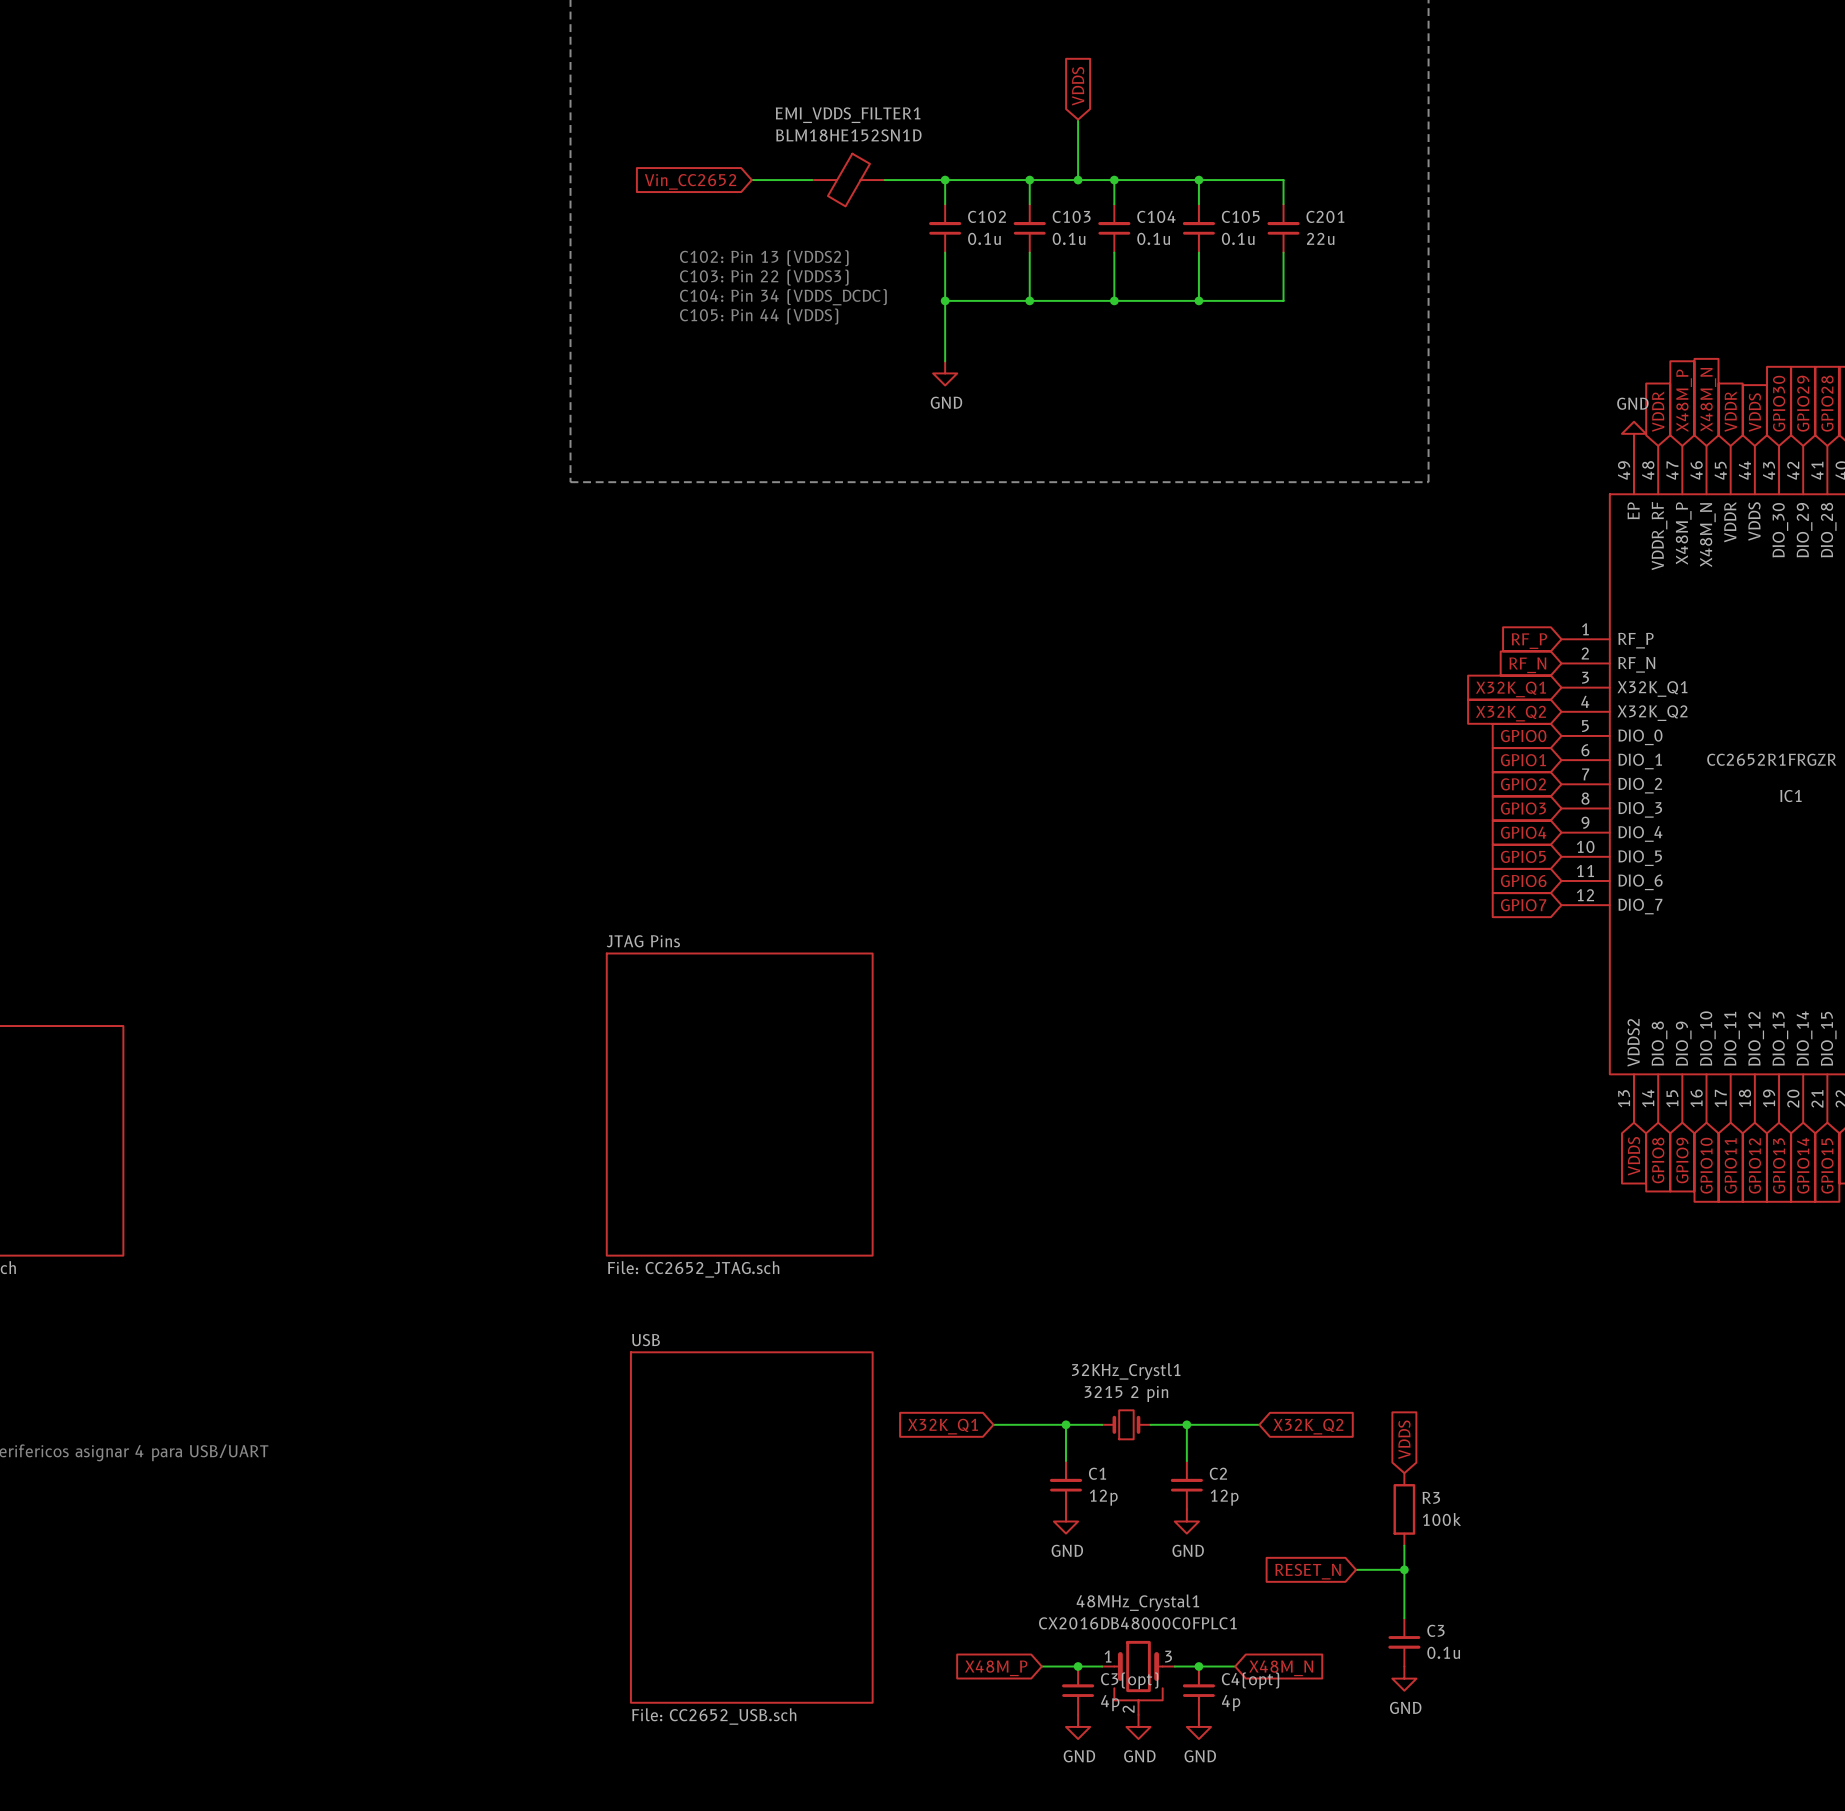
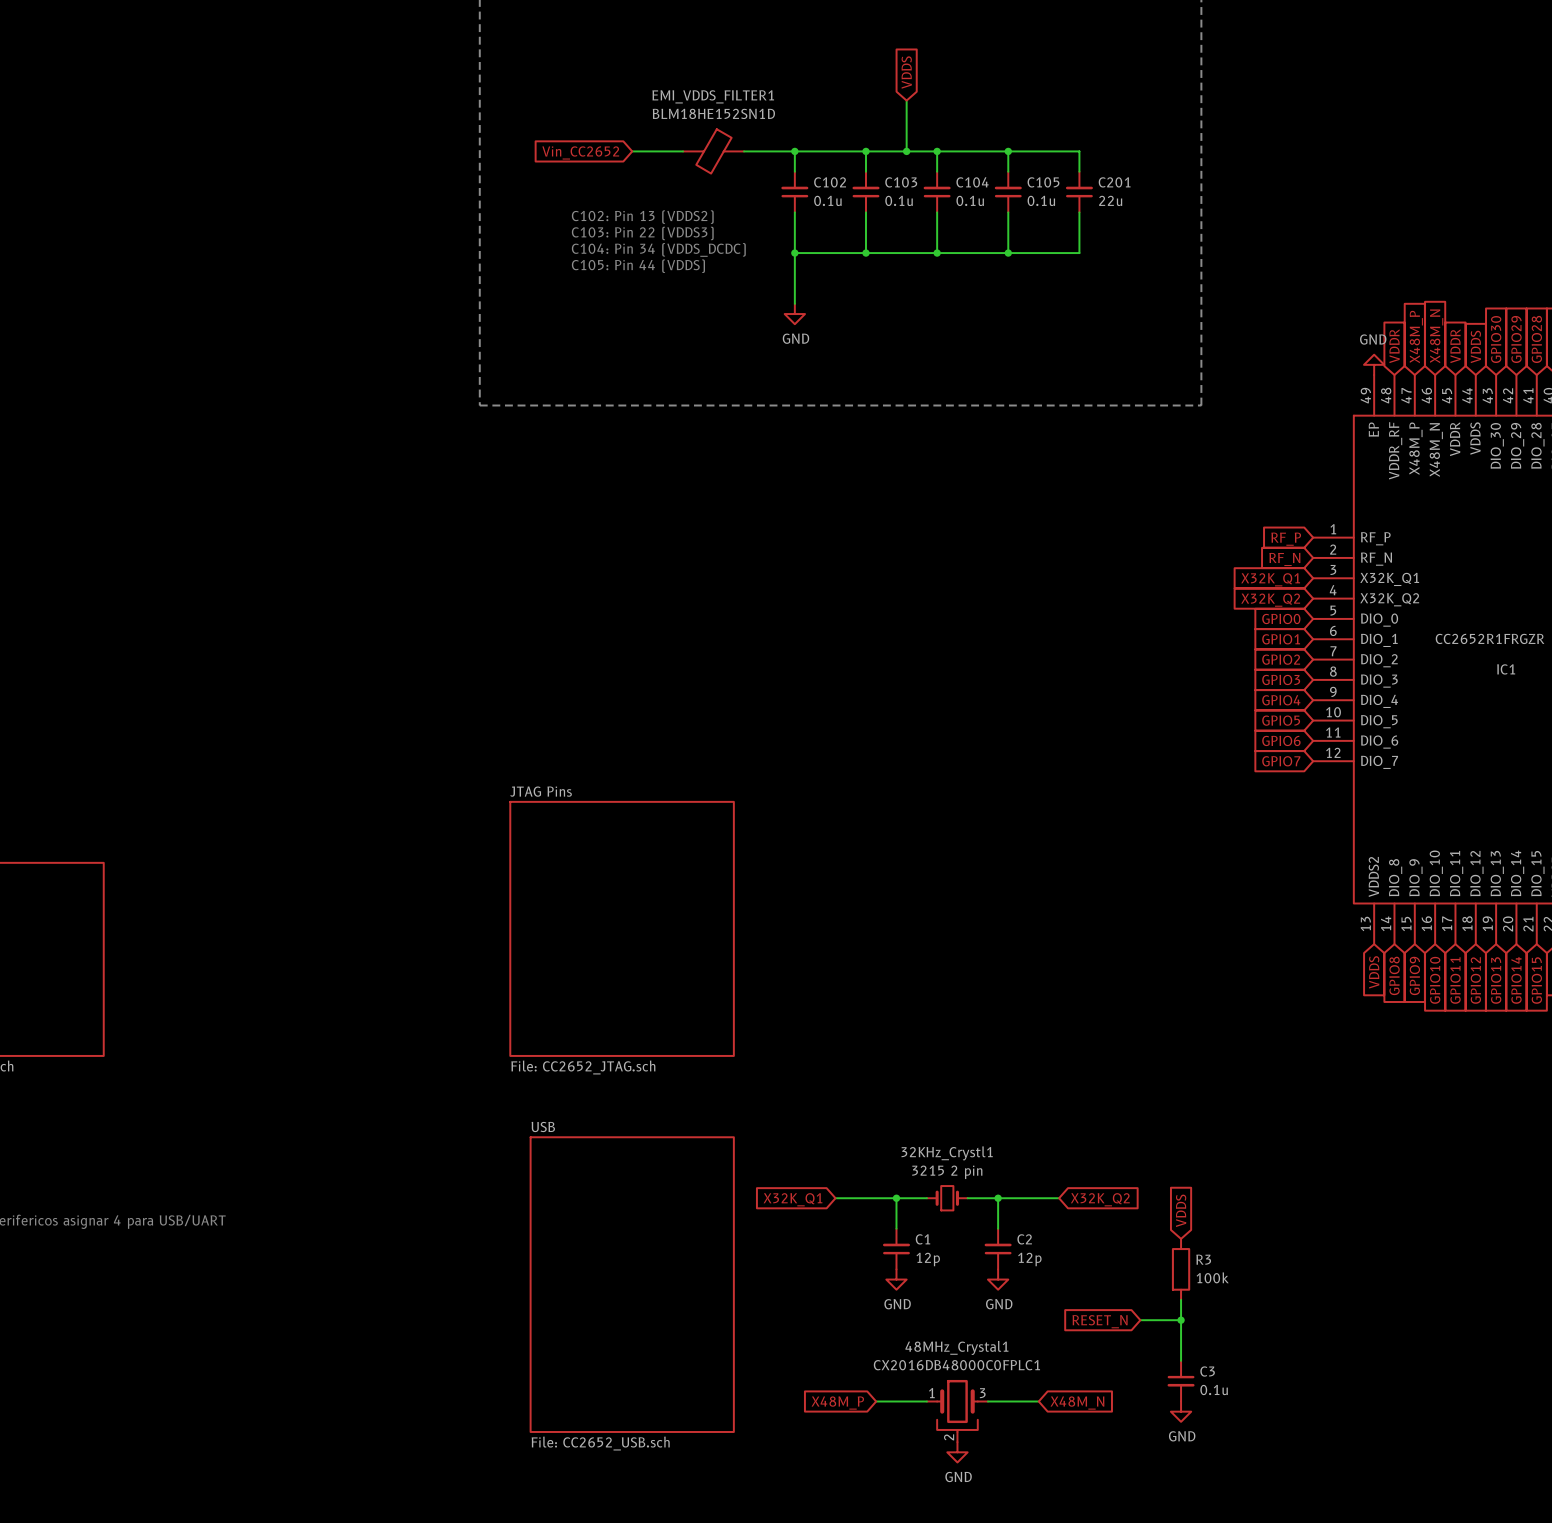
junction: (1078, 1666) -> none
junction: (1198, 1666) -> none
C3(opt): 4p (1078, 1690) -> none
C4(opt): 4p (1198, 1690) -> none
power symbol: GND (1078, 1726) -> none
power symbol: GND (1198, 1726) -> none

